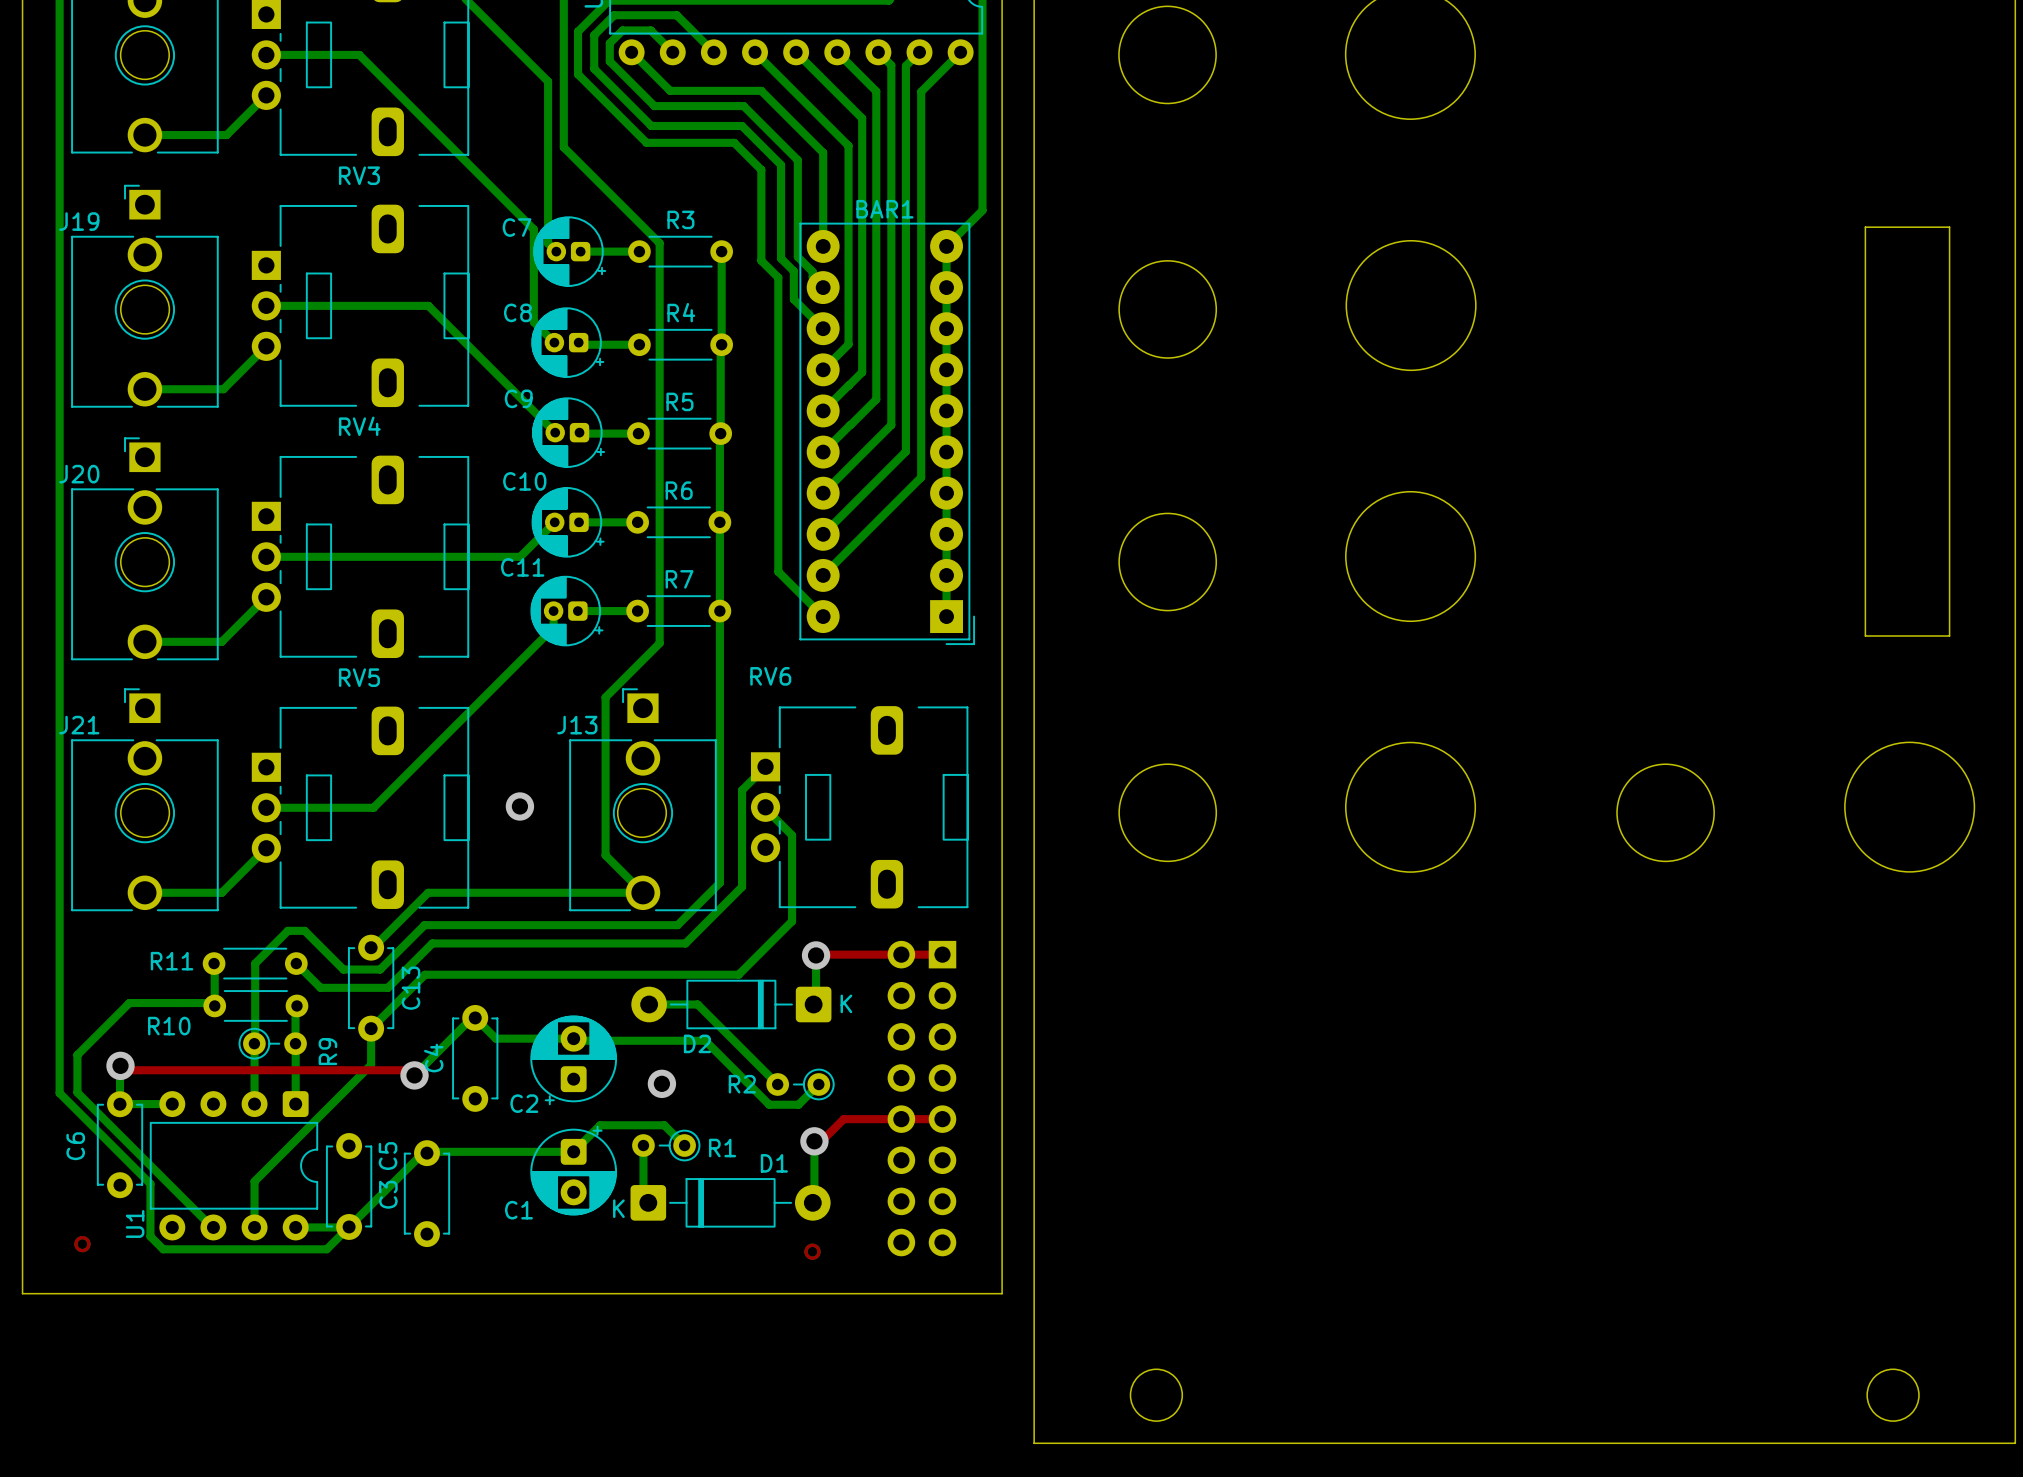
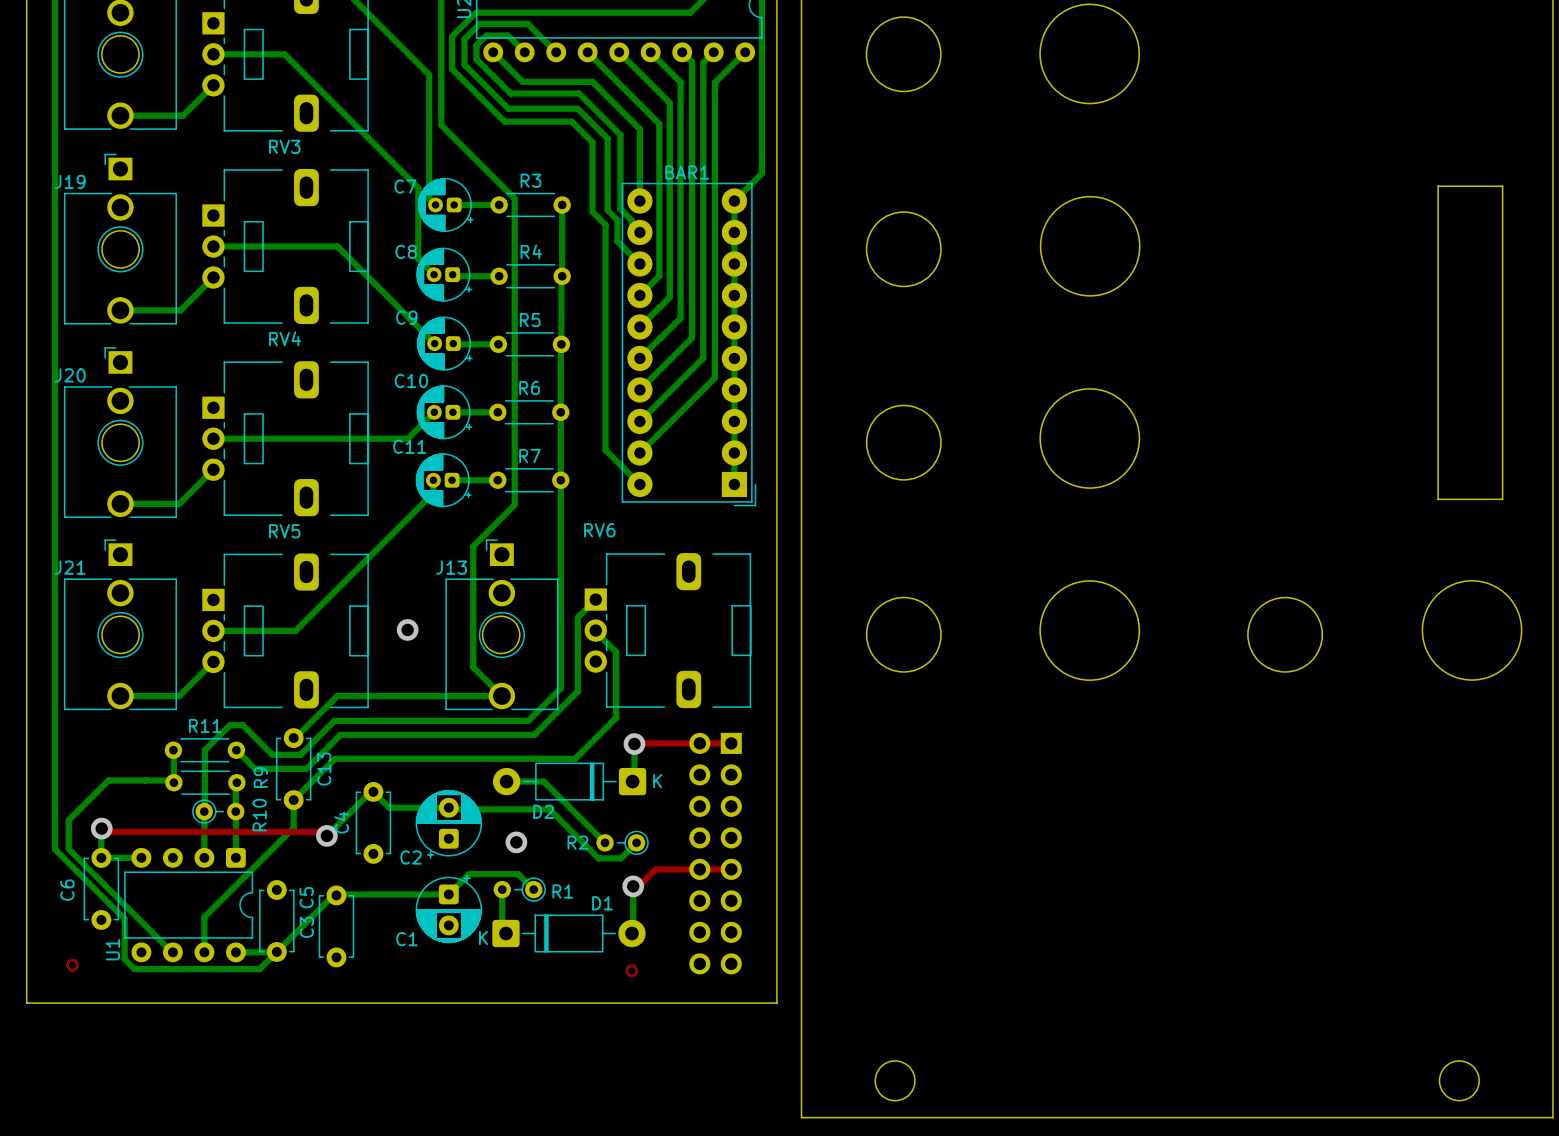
R11 name position: R11 (172, 961) -> R11 (205, 725)
R10 name rotation: 0° (169, 1026) -> 90° counterclockwise (259, 815)
R10 name position: R10 (169, 1026) -> R10 (259, 815)
R9 name position: R9 (327, 1051) -> R9 (260, 777)

